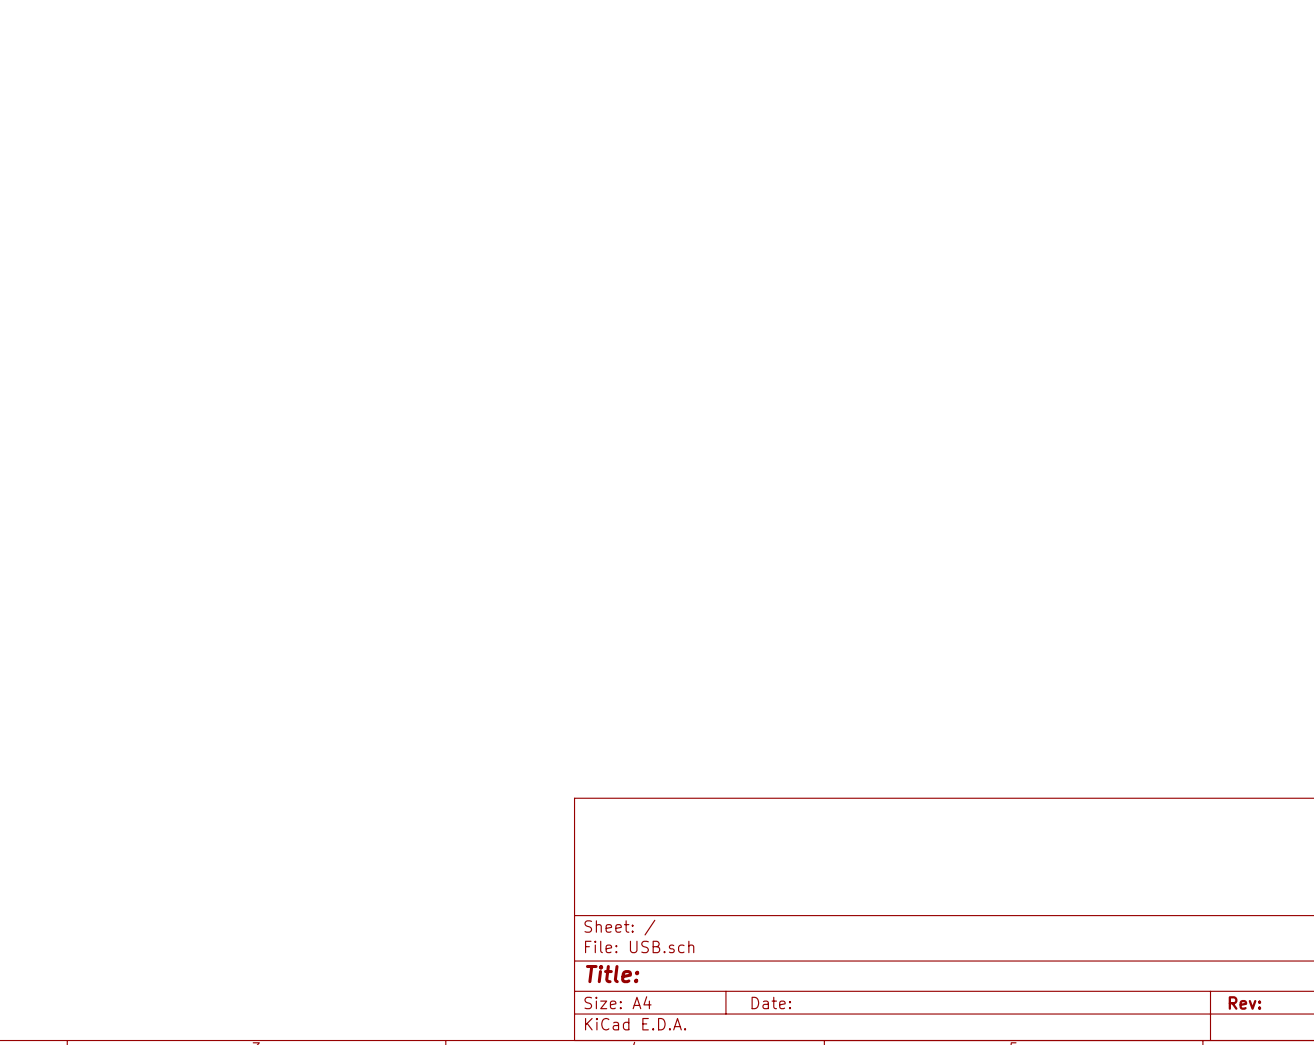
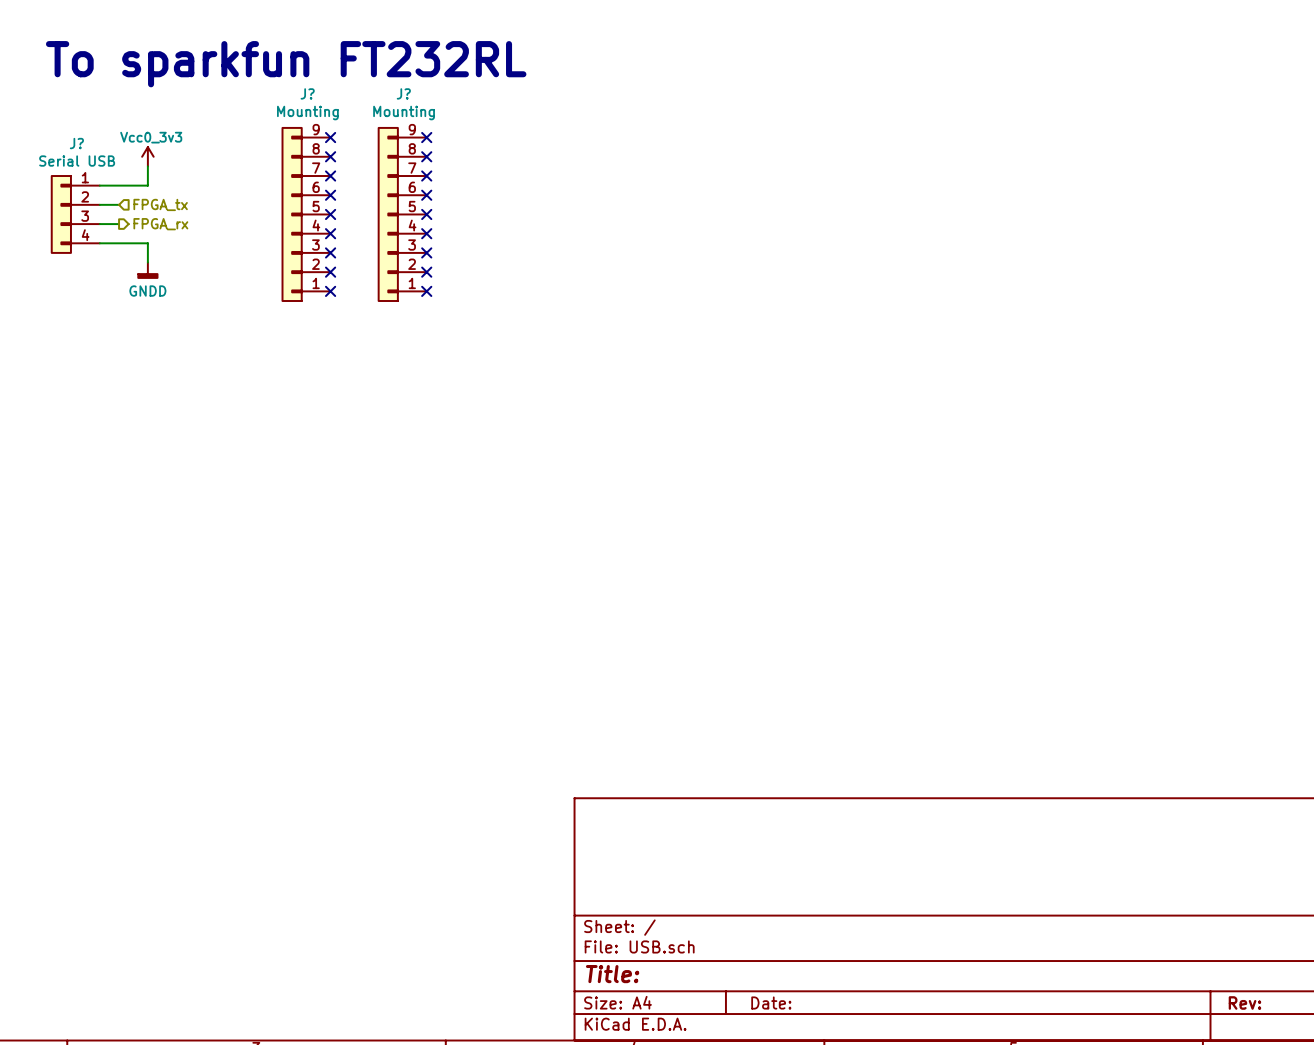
text: none -> To sparkfun FT232RL (286, 64)
no-connect mark: none -> (330, 137)
no-connect mark: none -> (426, 137)
part: none -> Vcc0_3v3 (147, 156)
no-connect mark: none -> (330, 156)
no-connect mark: none -> (426, 156)
wire: none -> (147, 166) (147, 185) (99, 185)
no-connect mark: none -> (330, 176)
no-connect mark: none -> (426, 176)
no-connect mark: none -> (330, 195)
no-connect mark: none -> (426, 195)
wire: none -> (99, 204) (119, 204)
hierarchical label: none -> FPGA_tx (160, 204)
J?: none -> Serial USB (75, 214)
J?: none -> Mounting (306, 214)
no-connect mark: none -> (330, 214)
J?: none -> Mounting (402, 214)
no-connect mark: none -> (426, 214)
wire: none -> (99, 224) (119, 224)
hierarchical label: none -> FPGA_rx (160, 224)
no-connect mark: none -> (330, 233)
no-connect mark: none -> (426, 233)
wire: none -> (99, 243) (147, 243) (147, 262)
no-connect mark: none -> (330, 252)
no-connect mark: none -> (426, 252)
power symbol: none -> GNDD (147, 270)
no-connect mark: none -> (330, 272)
no-connect mark: none -> (426, 272)
no-connect mark: none -> (330, 291)
no-connect mark: none -> (426, 291)

